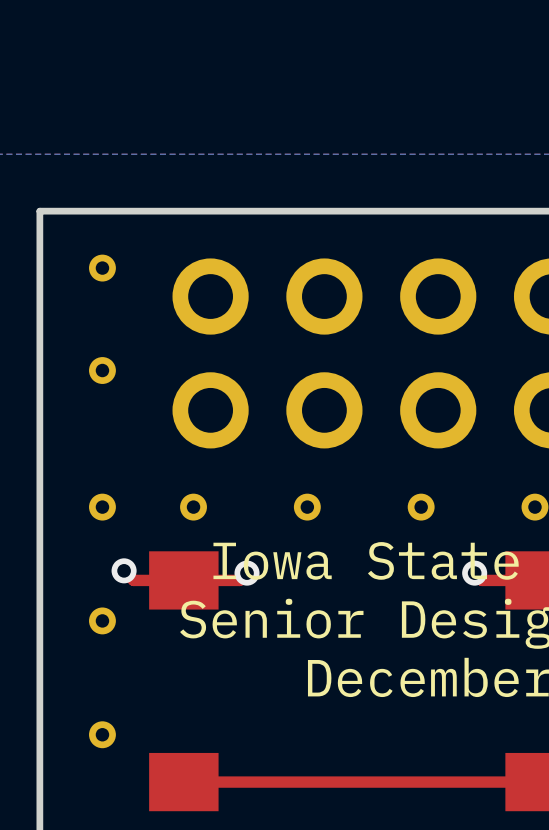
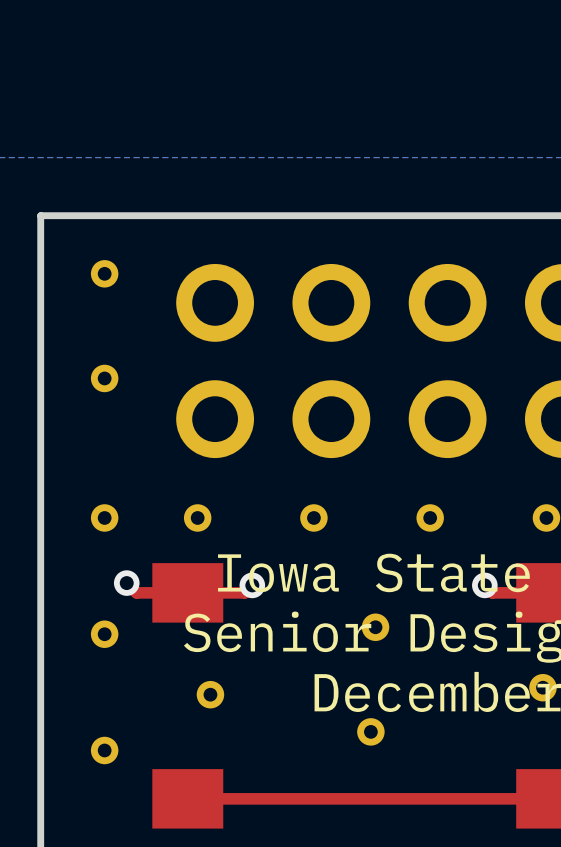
part: none -> (375, 627)
part: none -> (542, 687)
part: none -> (210, 694)
part: none -> (370, 731)

